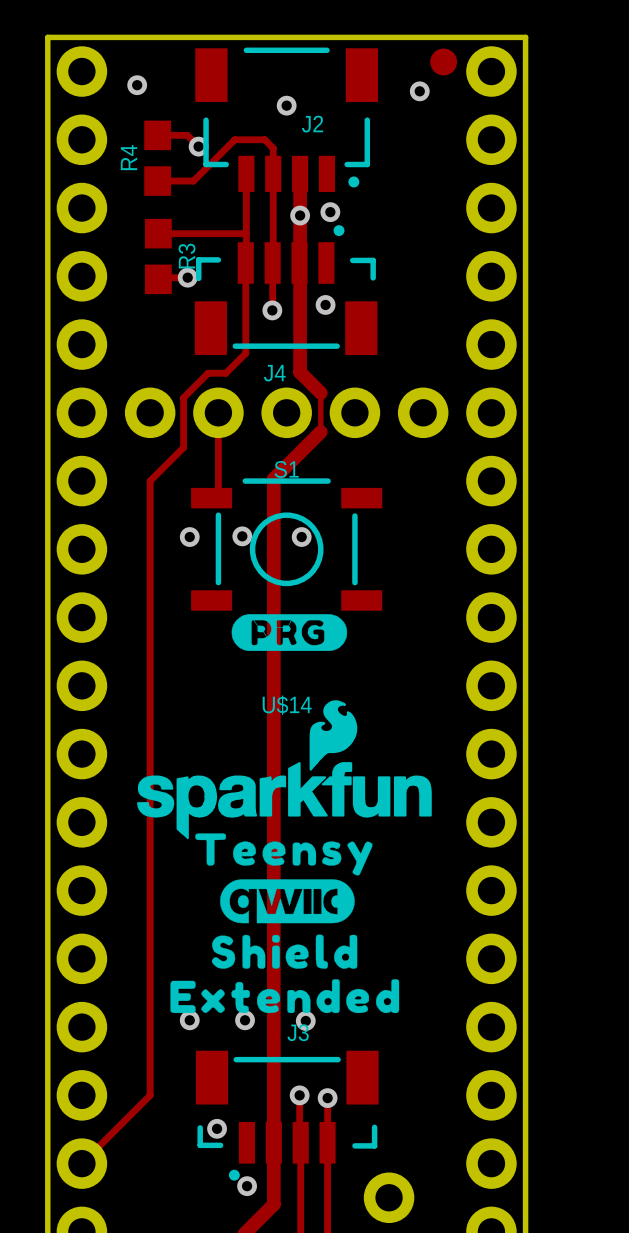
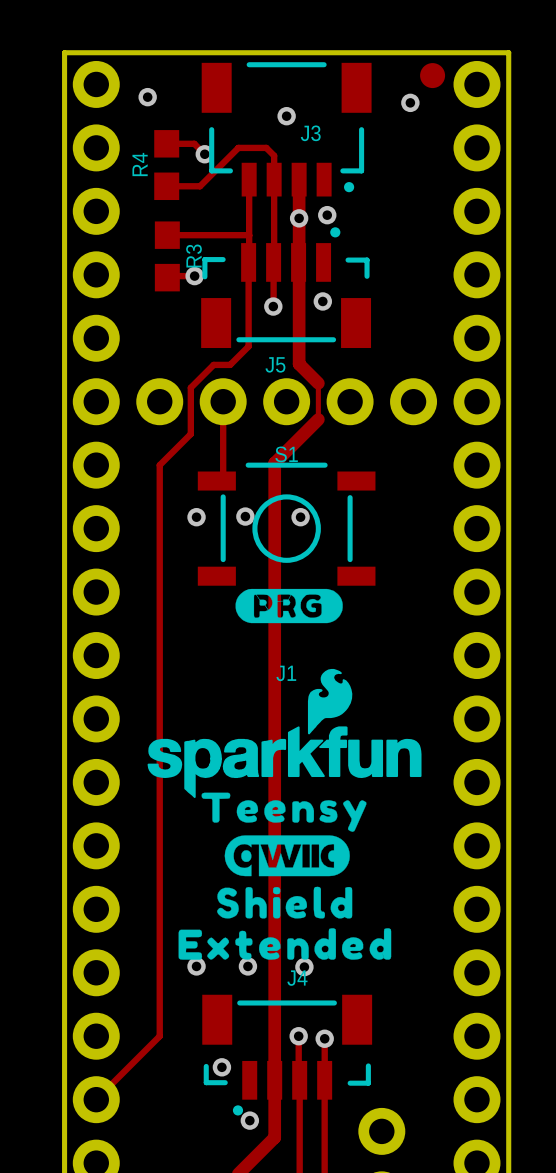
J2 name: J2 (312, 124) -> J3 (310, 133)
J4 name: J4 (274, 373) -> J5 (275, 364)
U$14 name: U$14 (287, 705) -> J1 (286, 673)
J3 name: J3 (298, 1032) -> J4 (297, 978)

